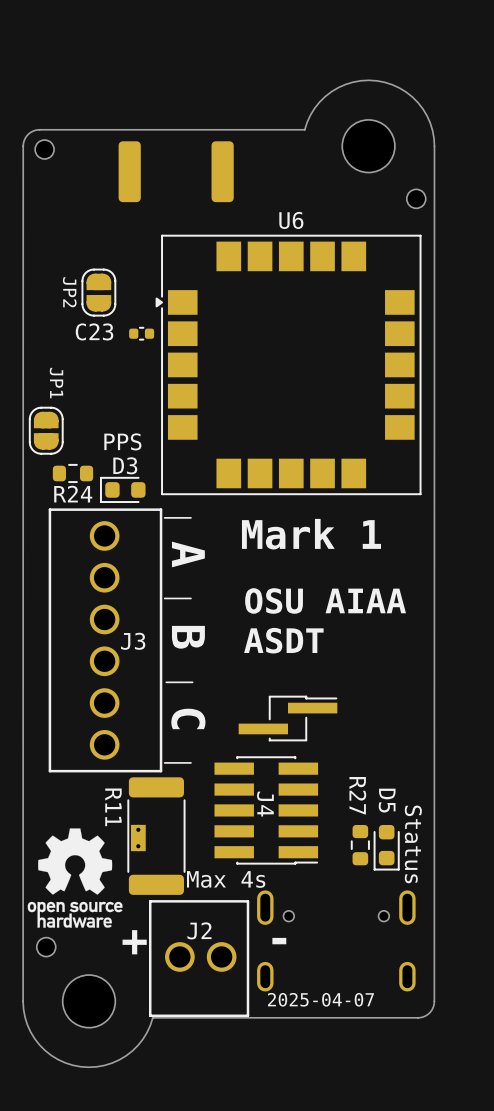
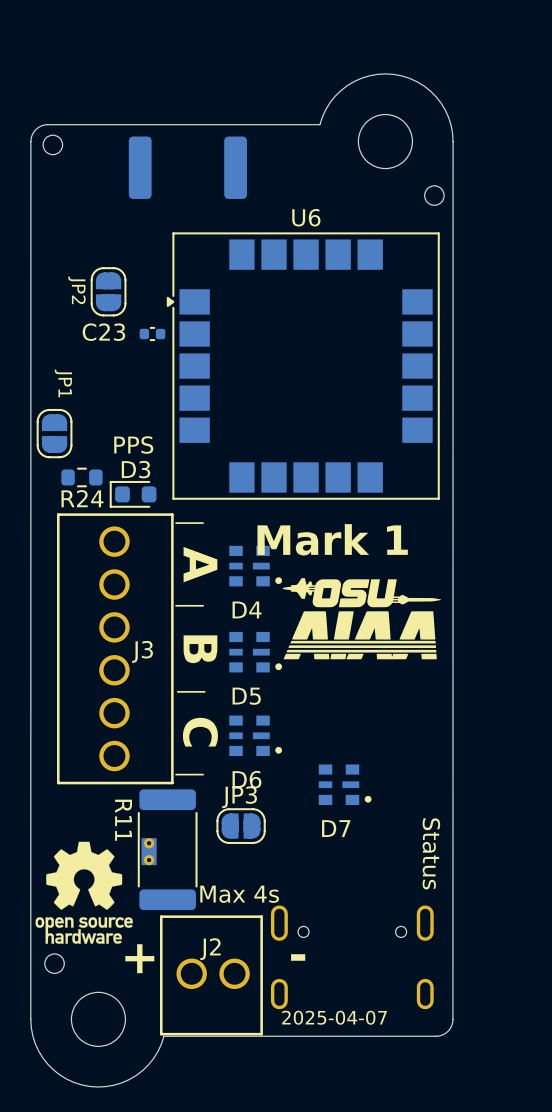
D4: none -> (255, 566)
drawing: none -> [282, 578, 442, 660]
text: OSU AIAA (325, 600) -> none
text: ASDT (283, 640) -> none
part: (288, 718) -> none
D6: none -> (255, 735)
D7: none -> (345, 784)
D5 name position: D5 (387, 800) -> D5 (246, 696)
J4: (266, 810) -> none
JP3: none -> (241, 826)
D5 footprint: [373, 825, 400, 871] -> [229, 631, 283, 673]
R27: (360, 845) -> none

